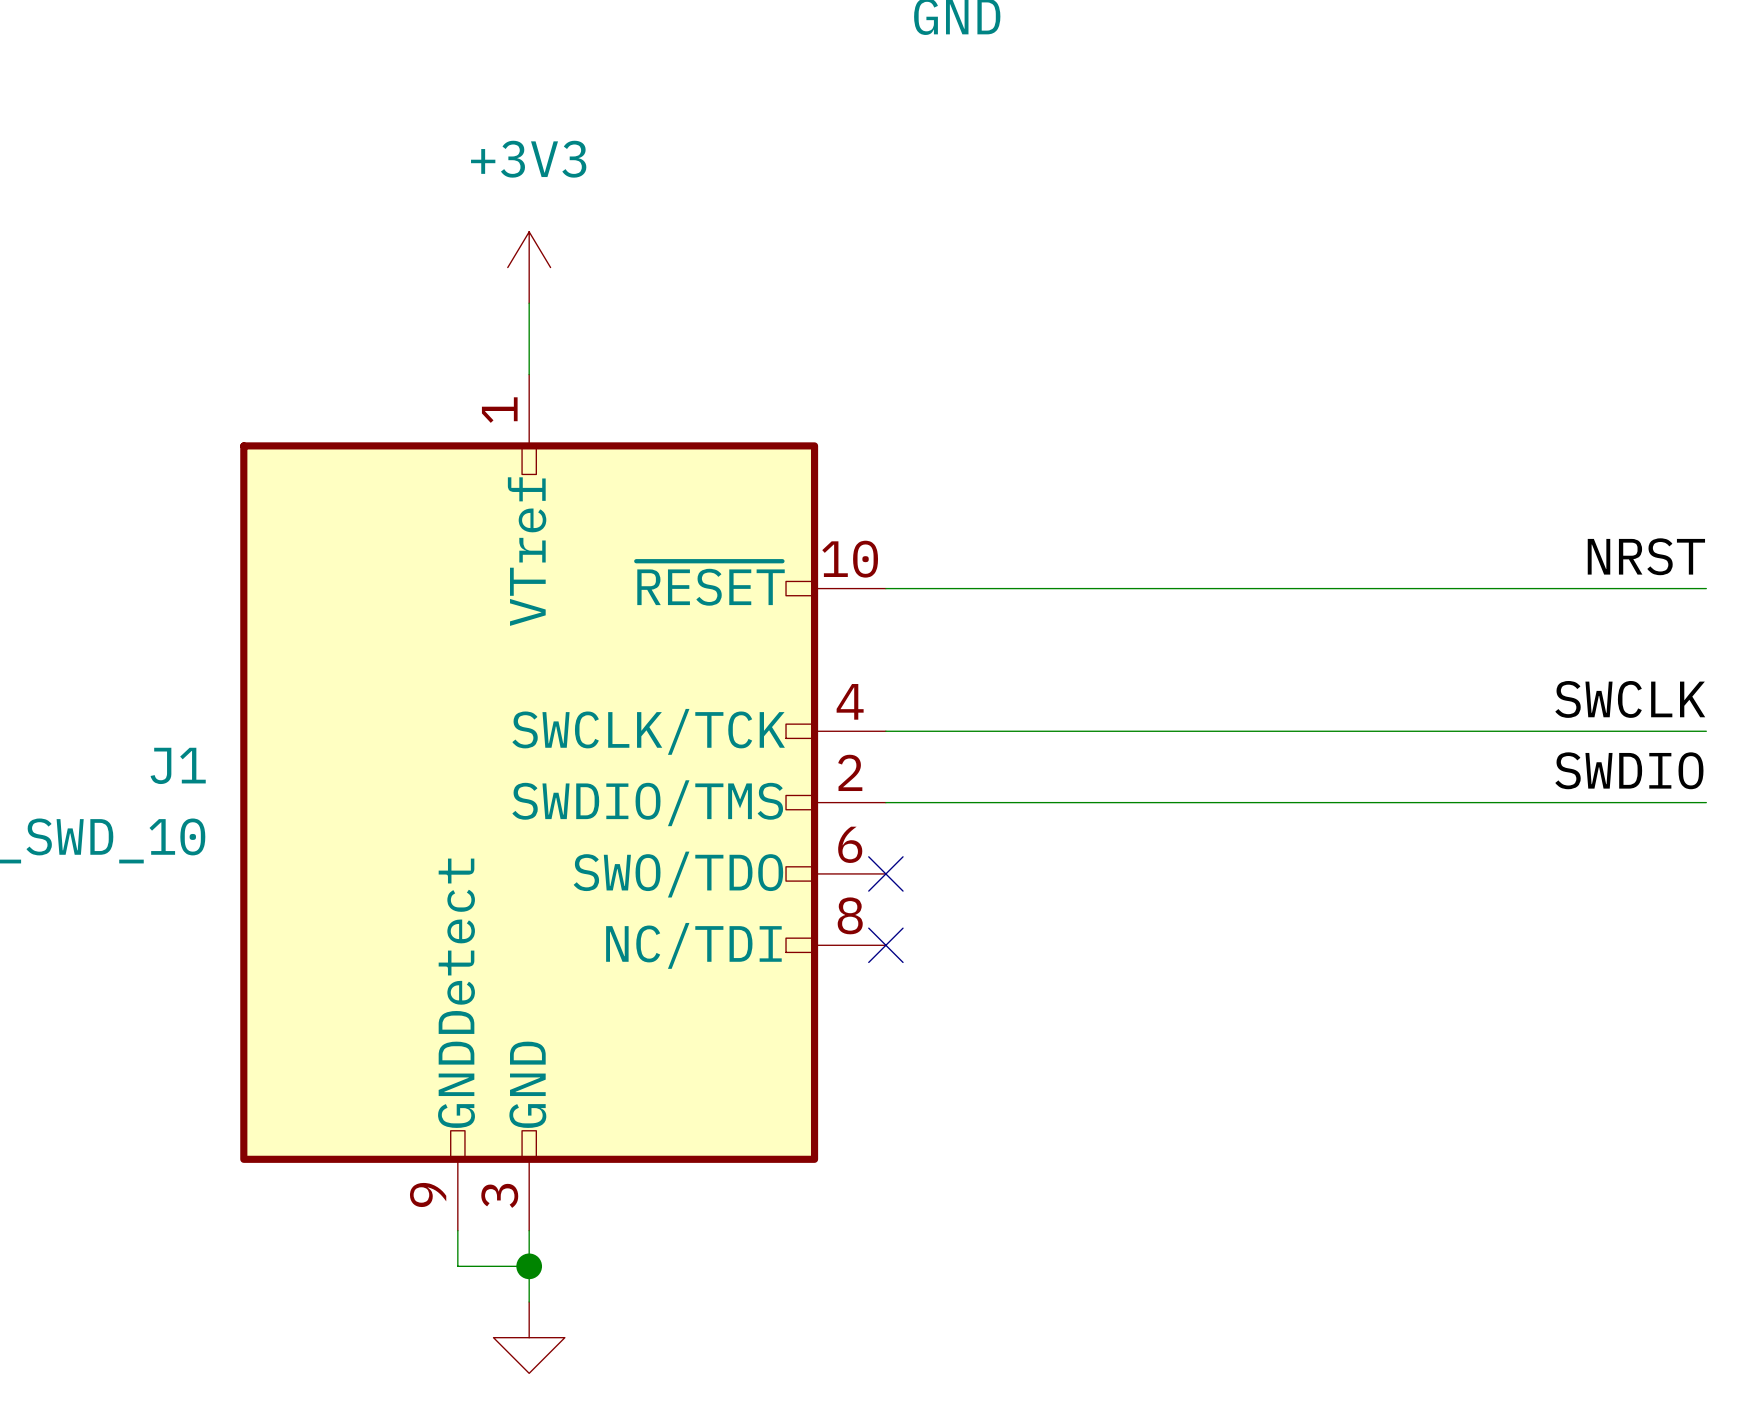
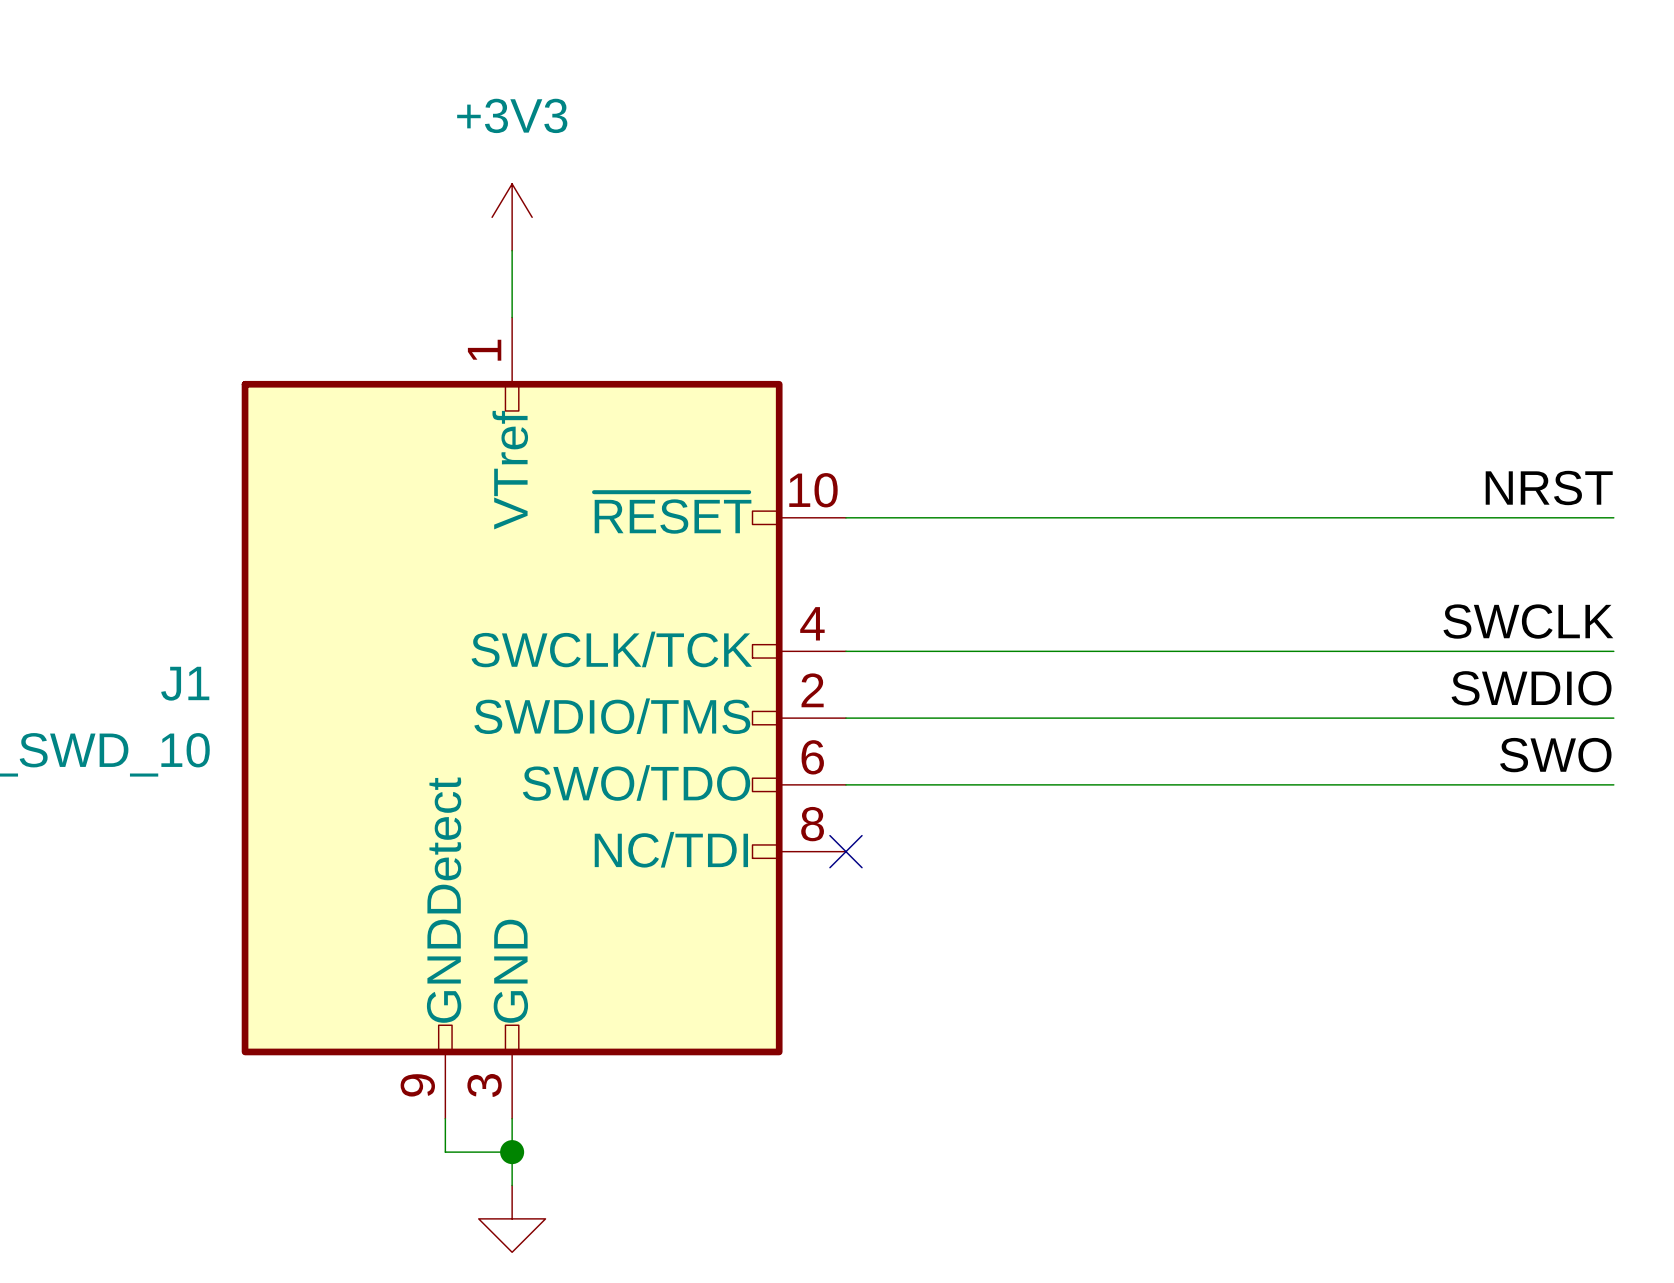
label: none -> SWO (1555, 755)
wire: none -> (845, 784) (1613, 784)
no-connect mark: (885, 873) -> none

